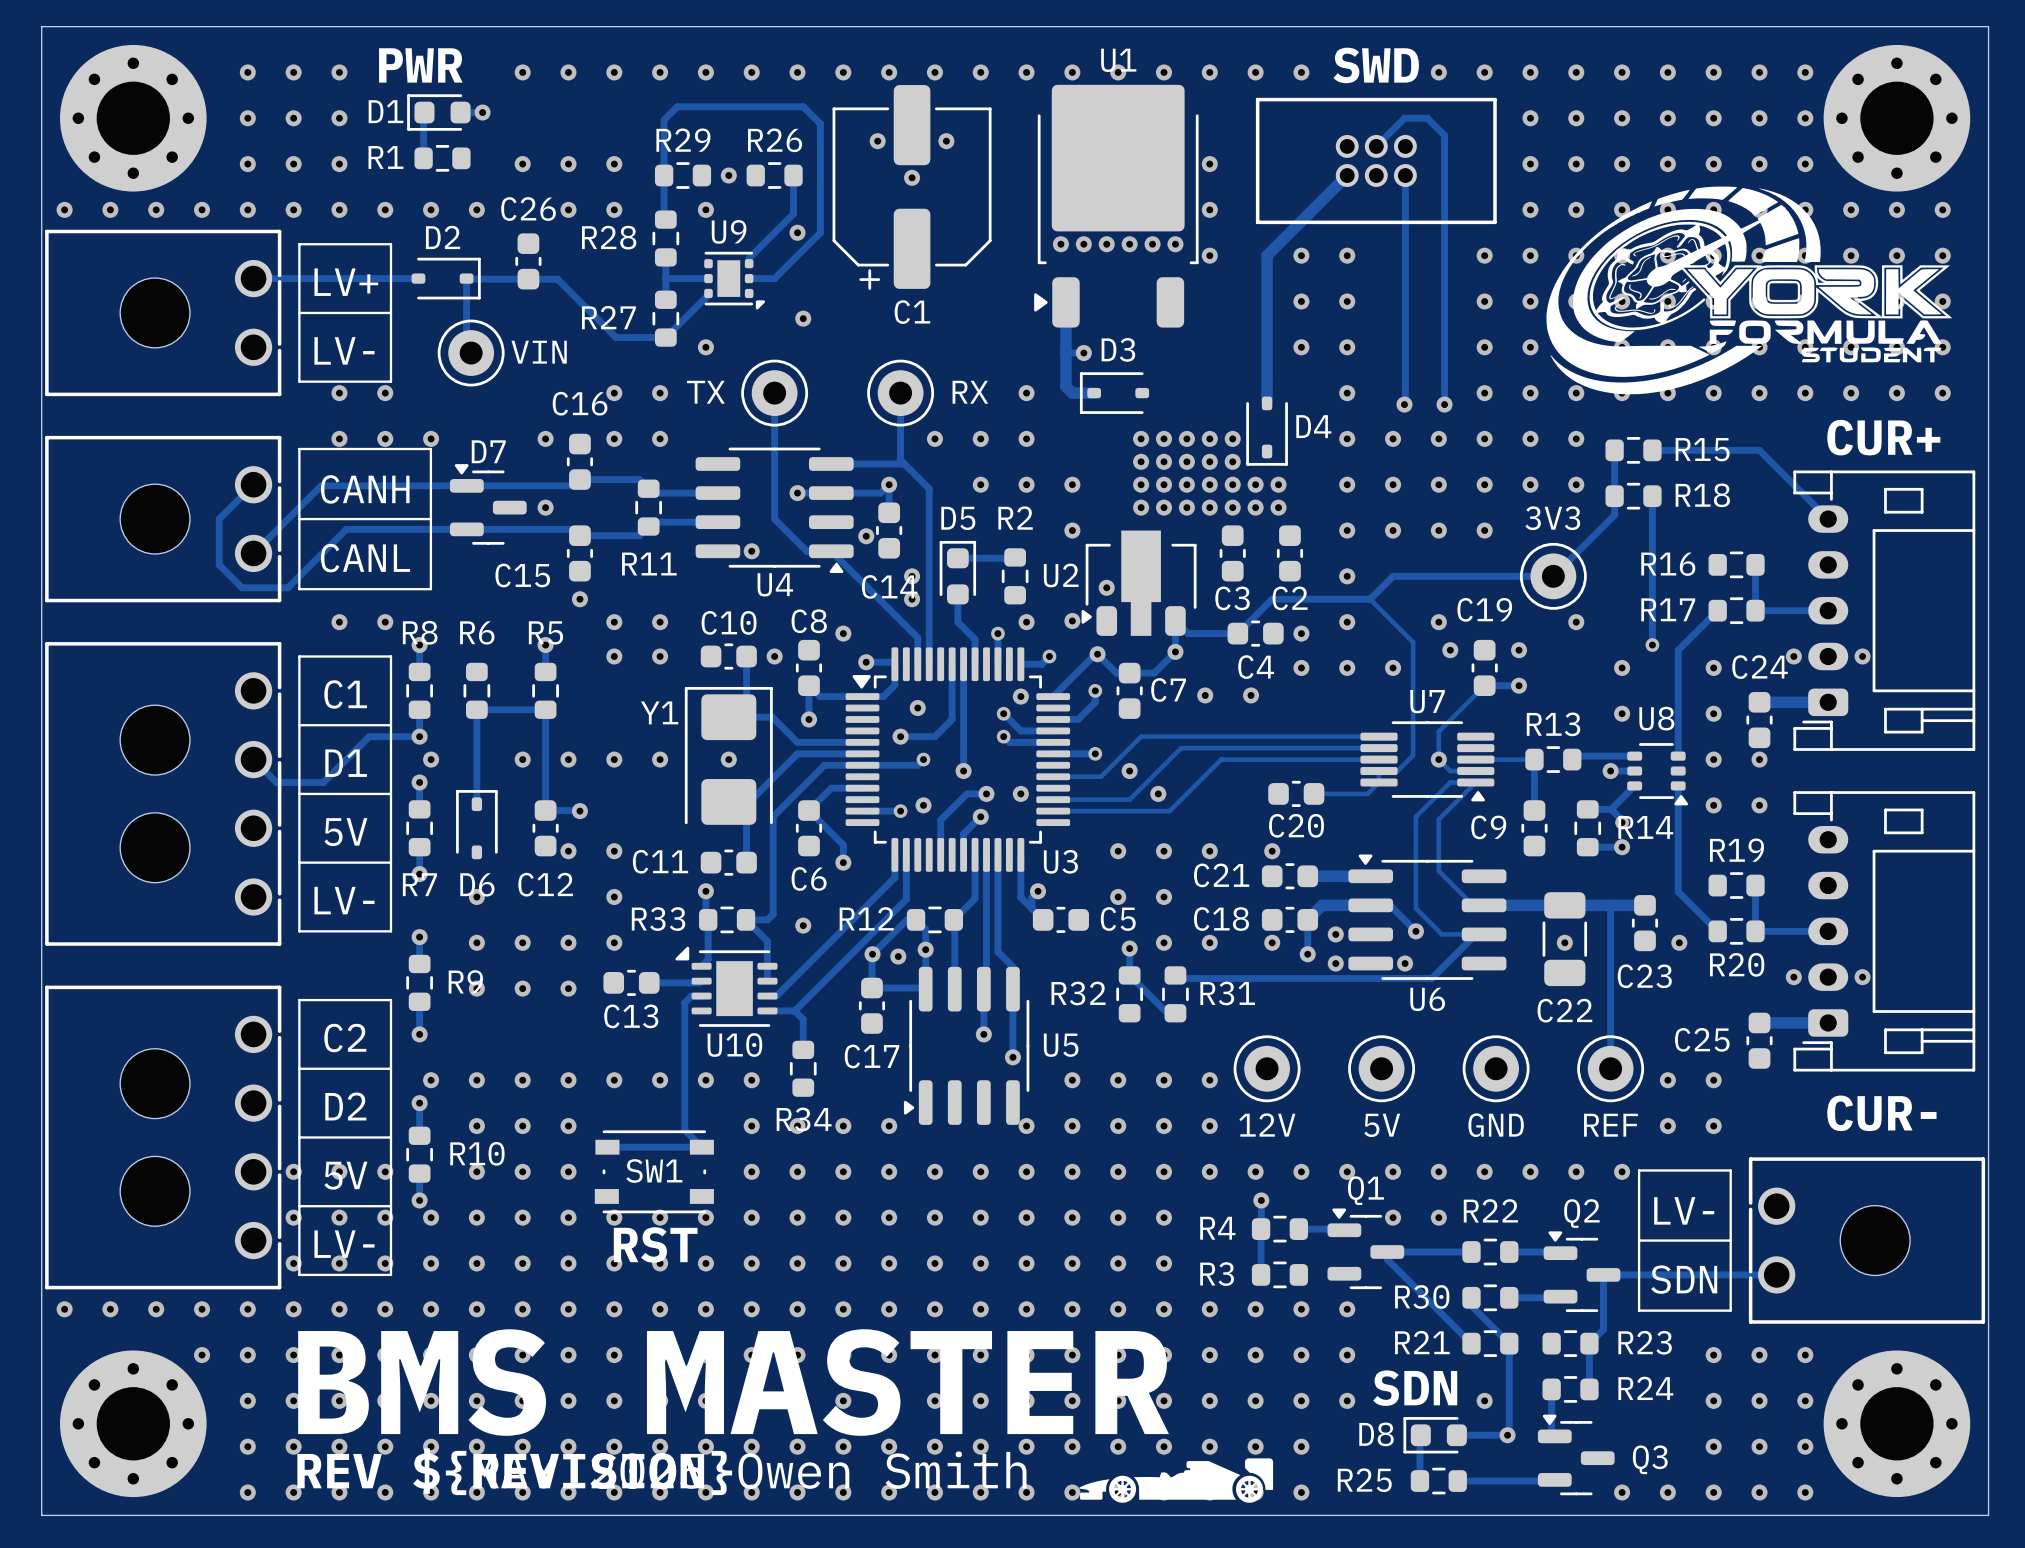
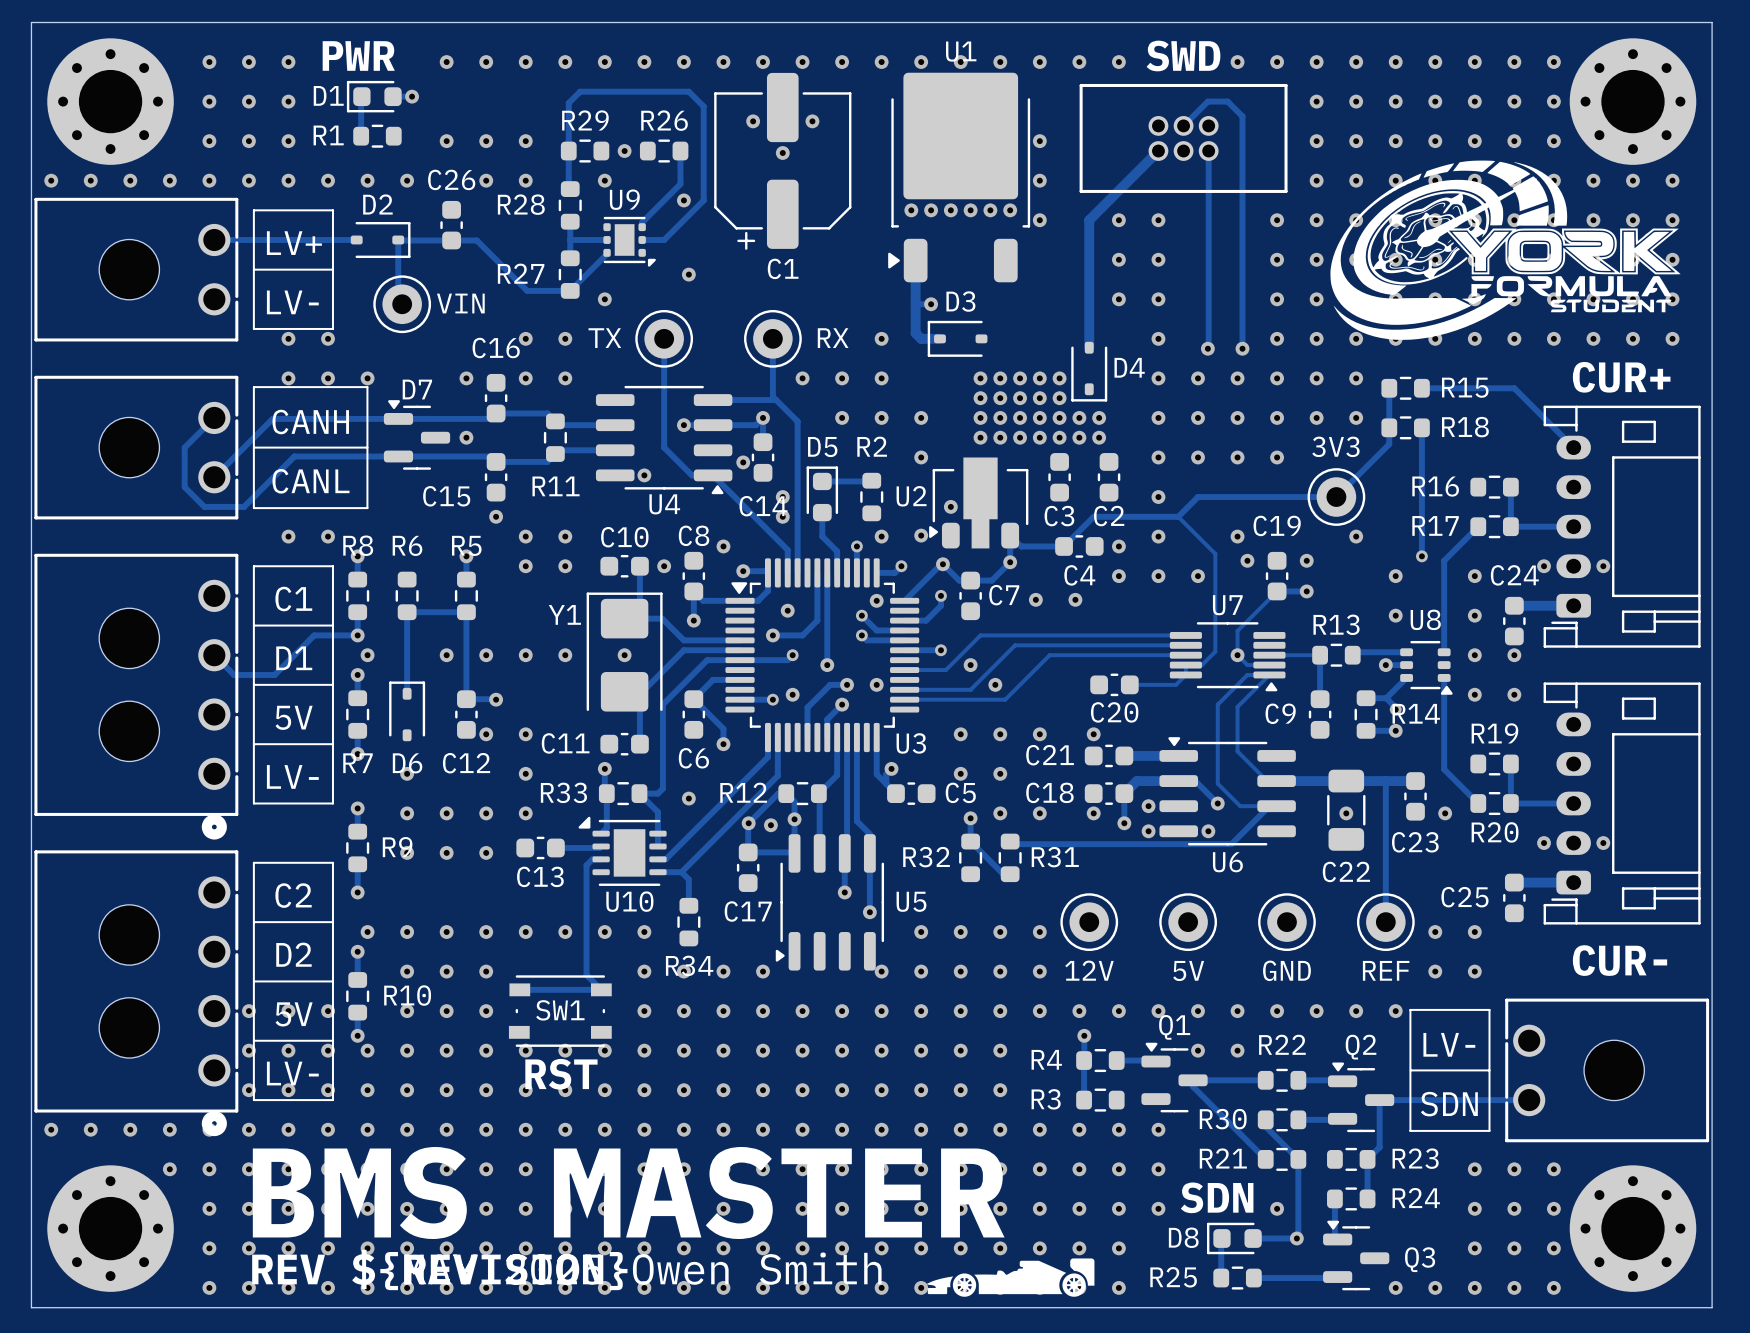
part footprint: [45, 642, 282, 965] -> [34, 553, 239, 840]
part footprint: [45, 985, 282, 1309] -> [34, 850, 239, 1137]

